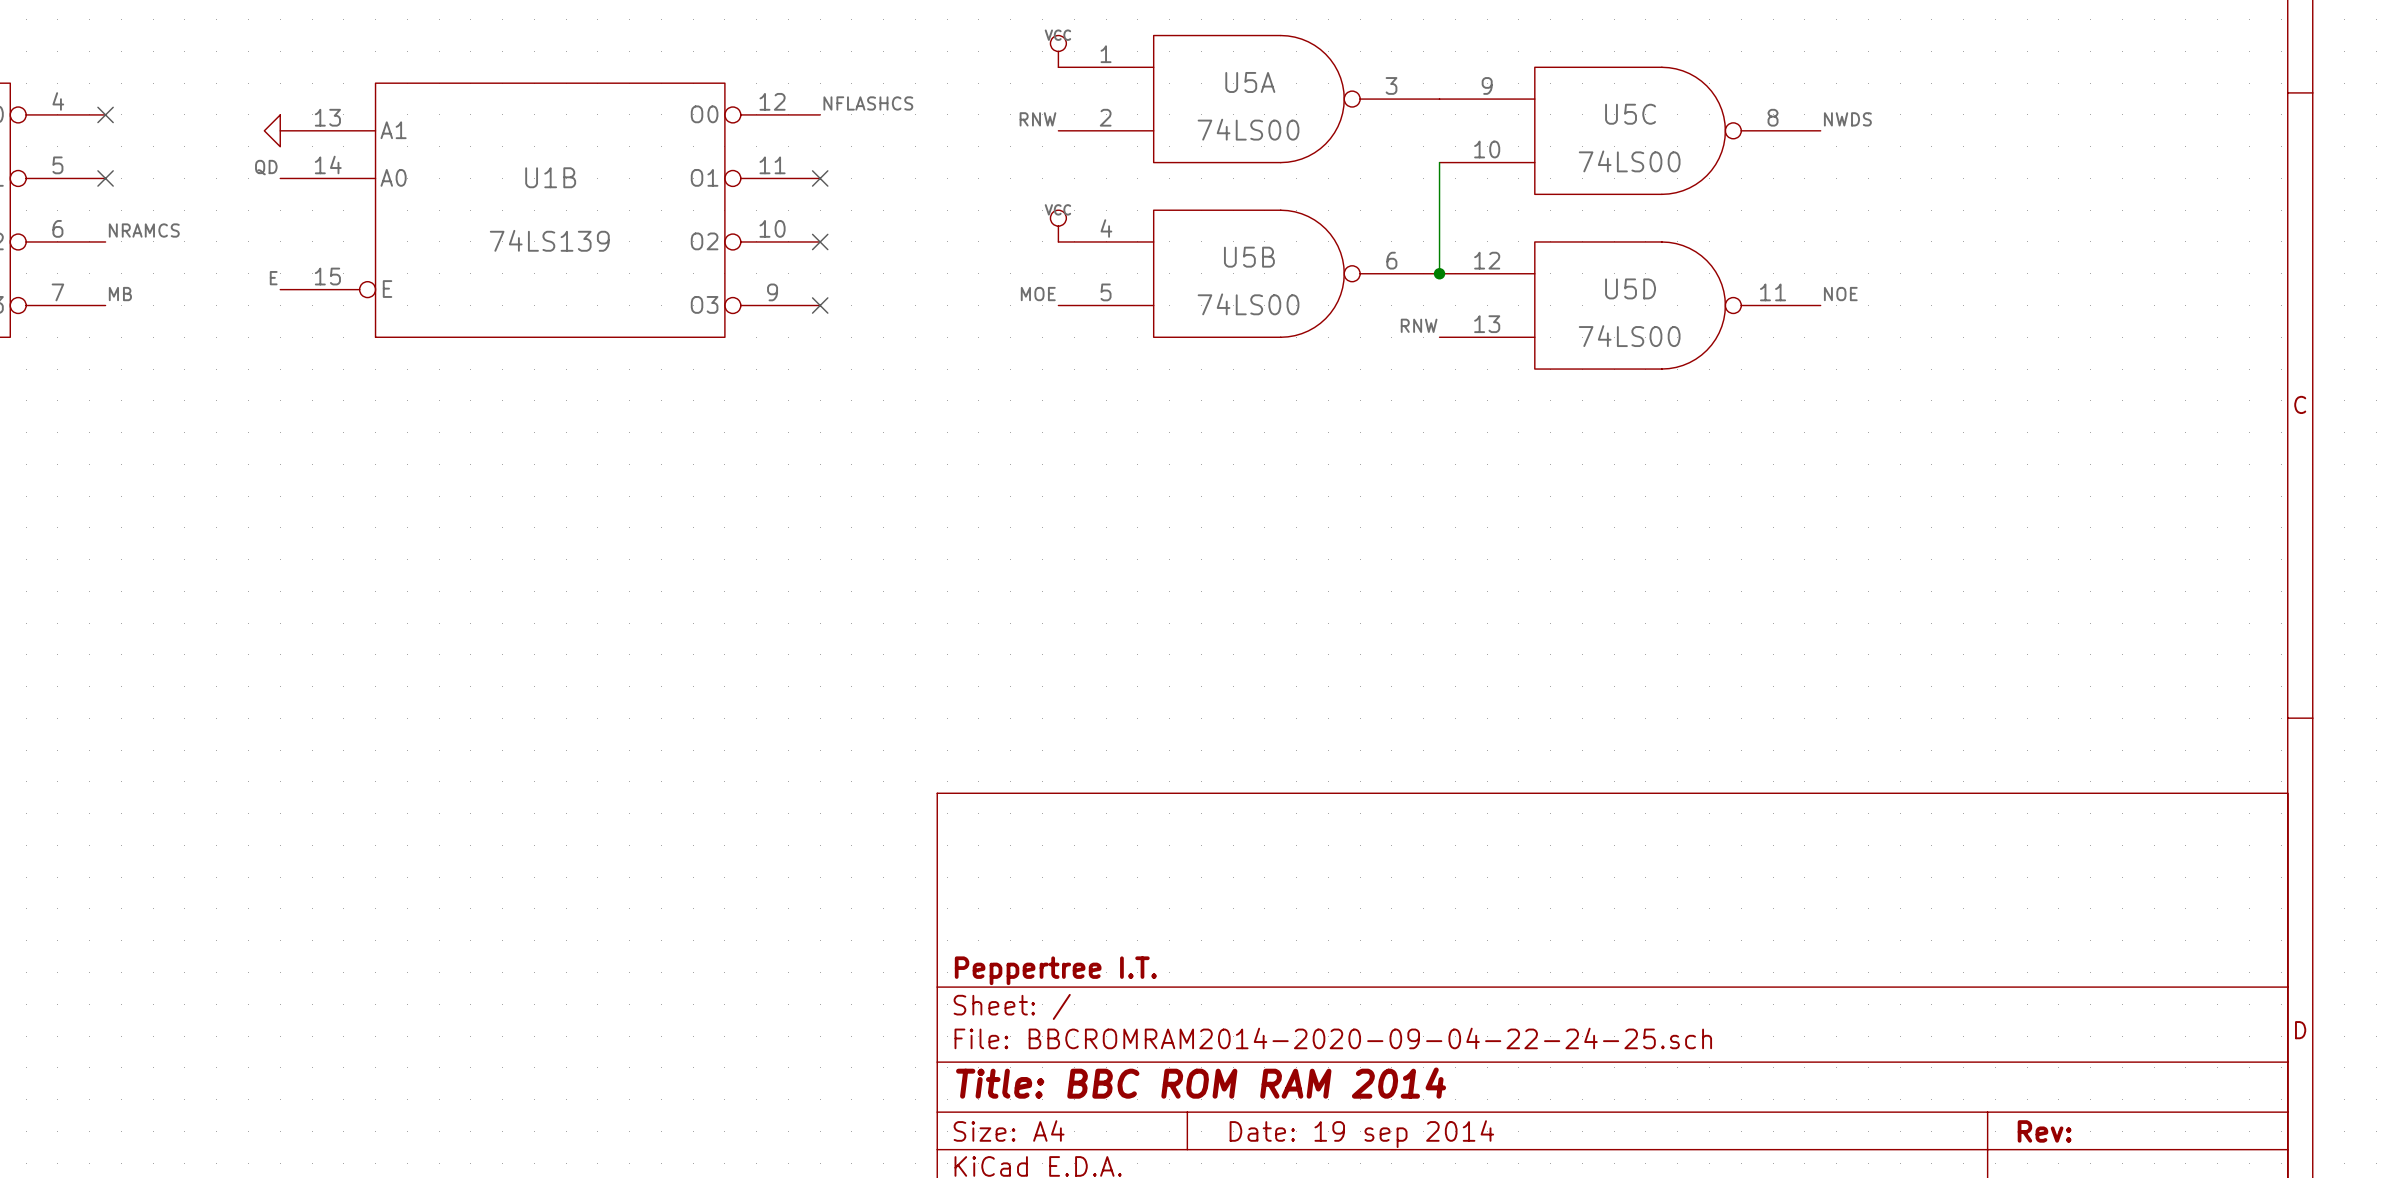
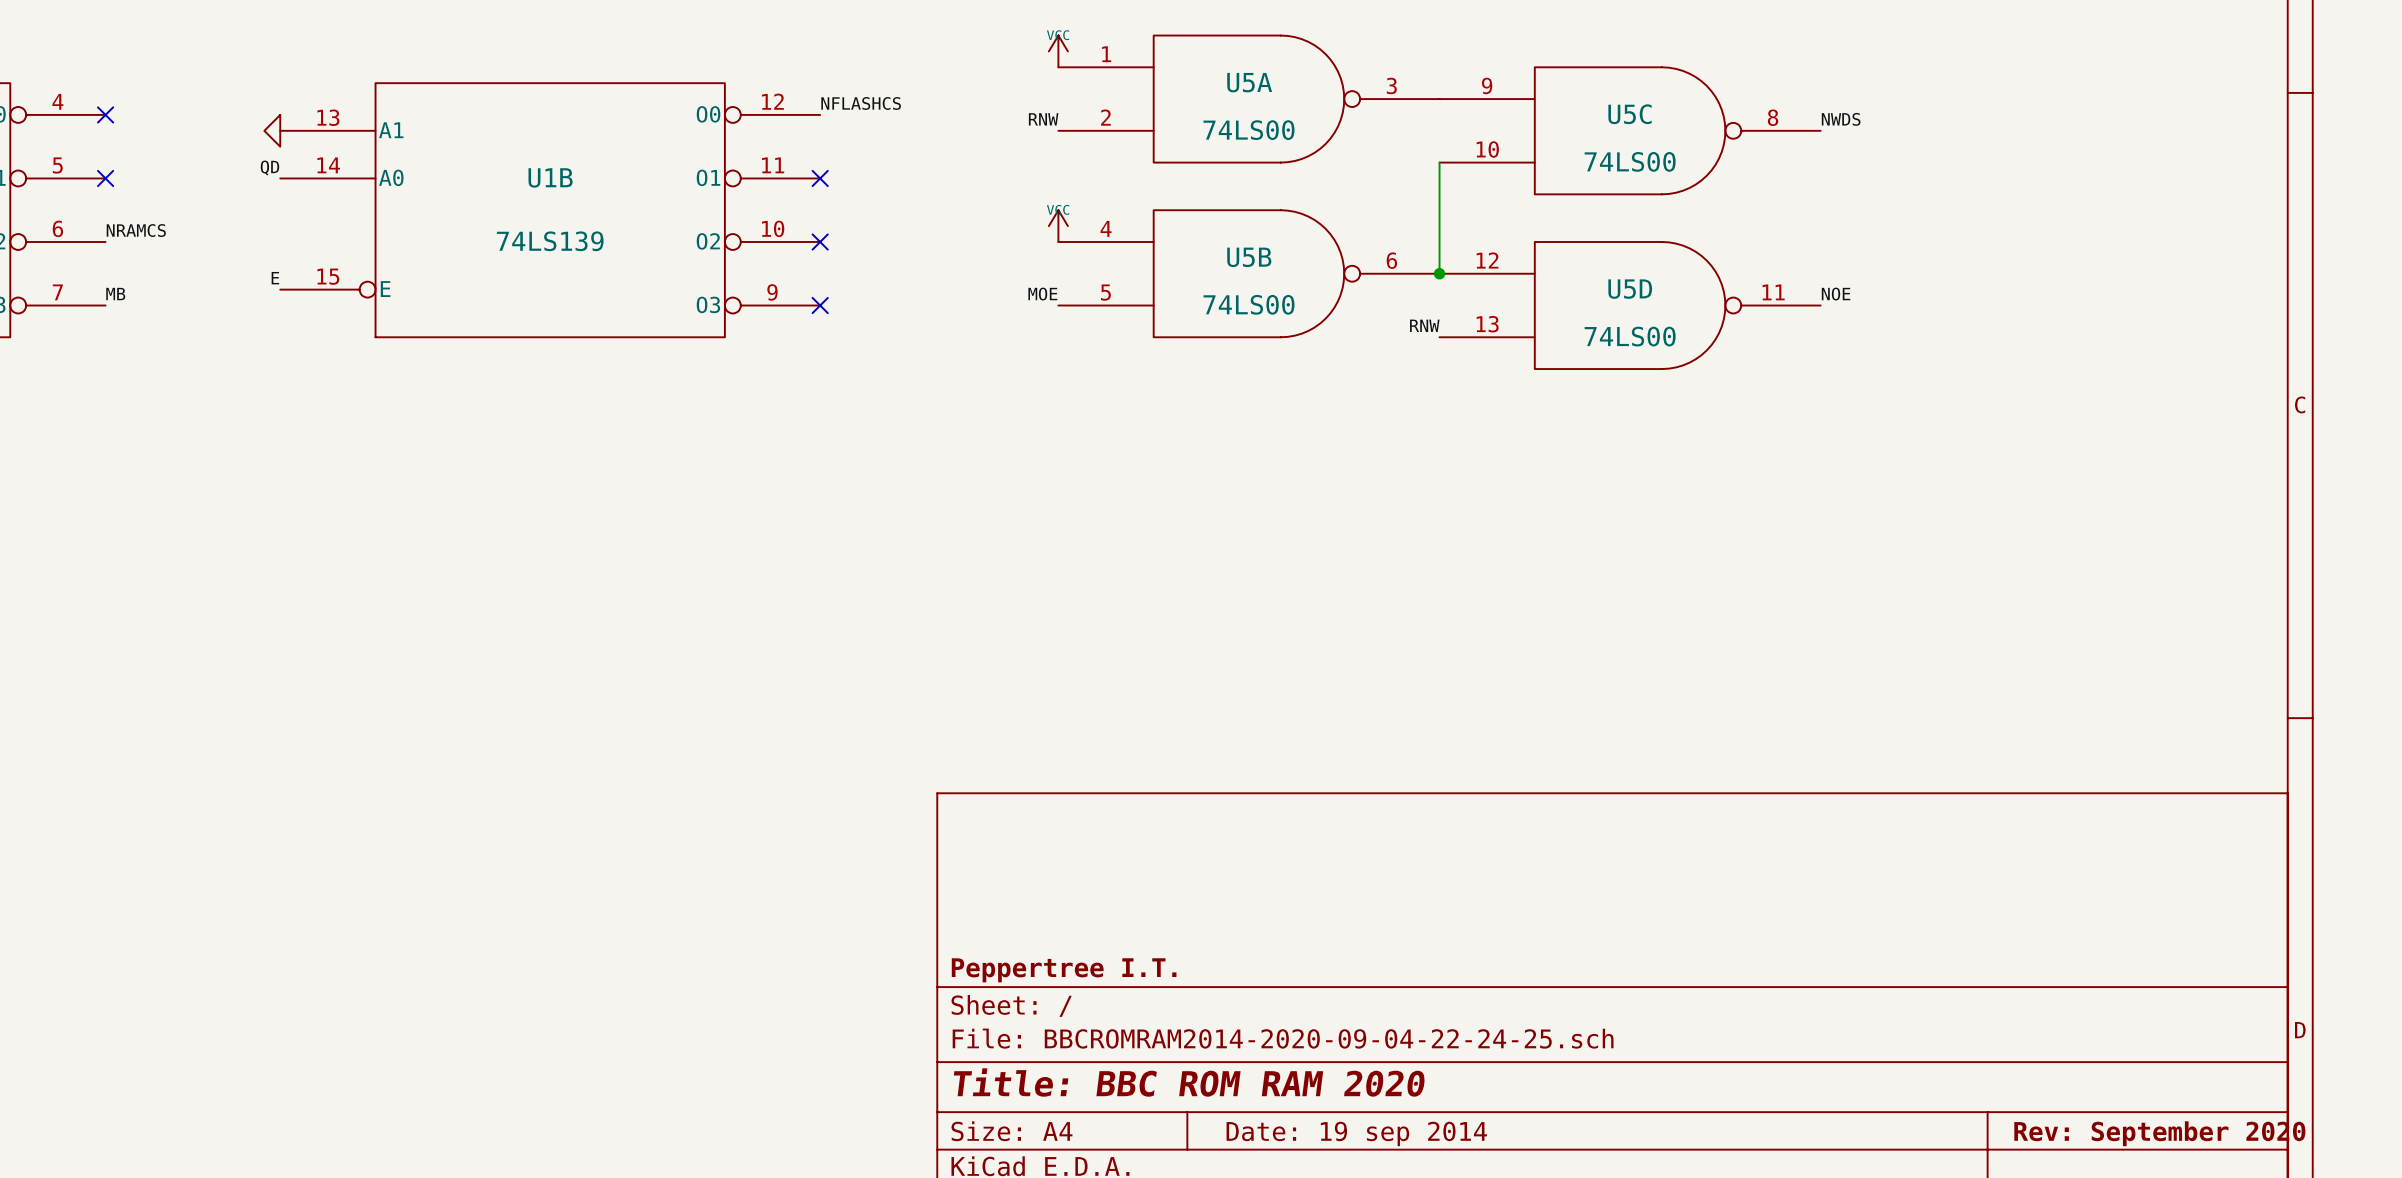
power symbol shape: [1050, 35, 1067, 68] -> [1048, 35, 1068, 68]
power symbol shape: [1050, 210, 1067, 242] -> [1048, 210, 1068, 242]
title block: Title: BBC ROM RAM 2014 (1201, 1083) -> Title: BBC ROM RAM 2020 (1189, 1082)
title block: Rev: (2044, 1131) -> Rev: September 2020 (2159, 1133)

